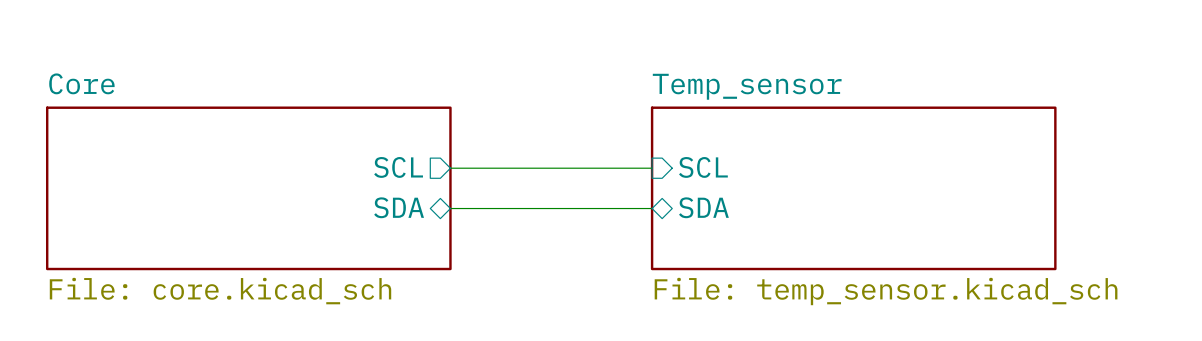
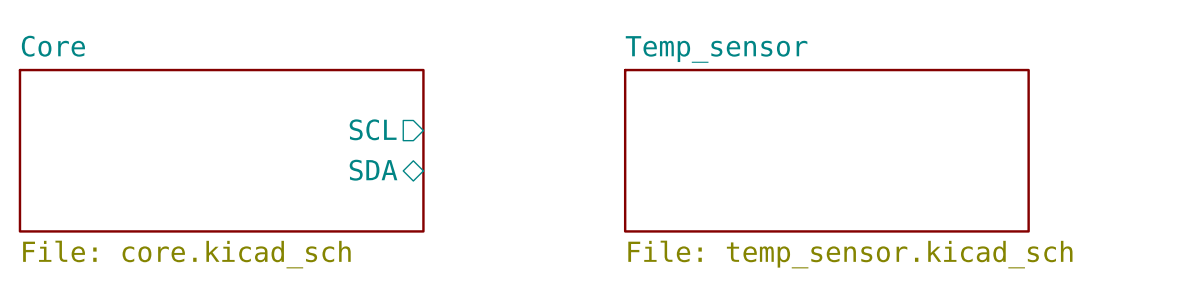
sheet pin: SCL (703, 167) -> none
wire: (450, 168) (652, 168) -> none
sheet pin: SDA (703, 207) -> none
wire: (450, 208) (652, 208) -> none

